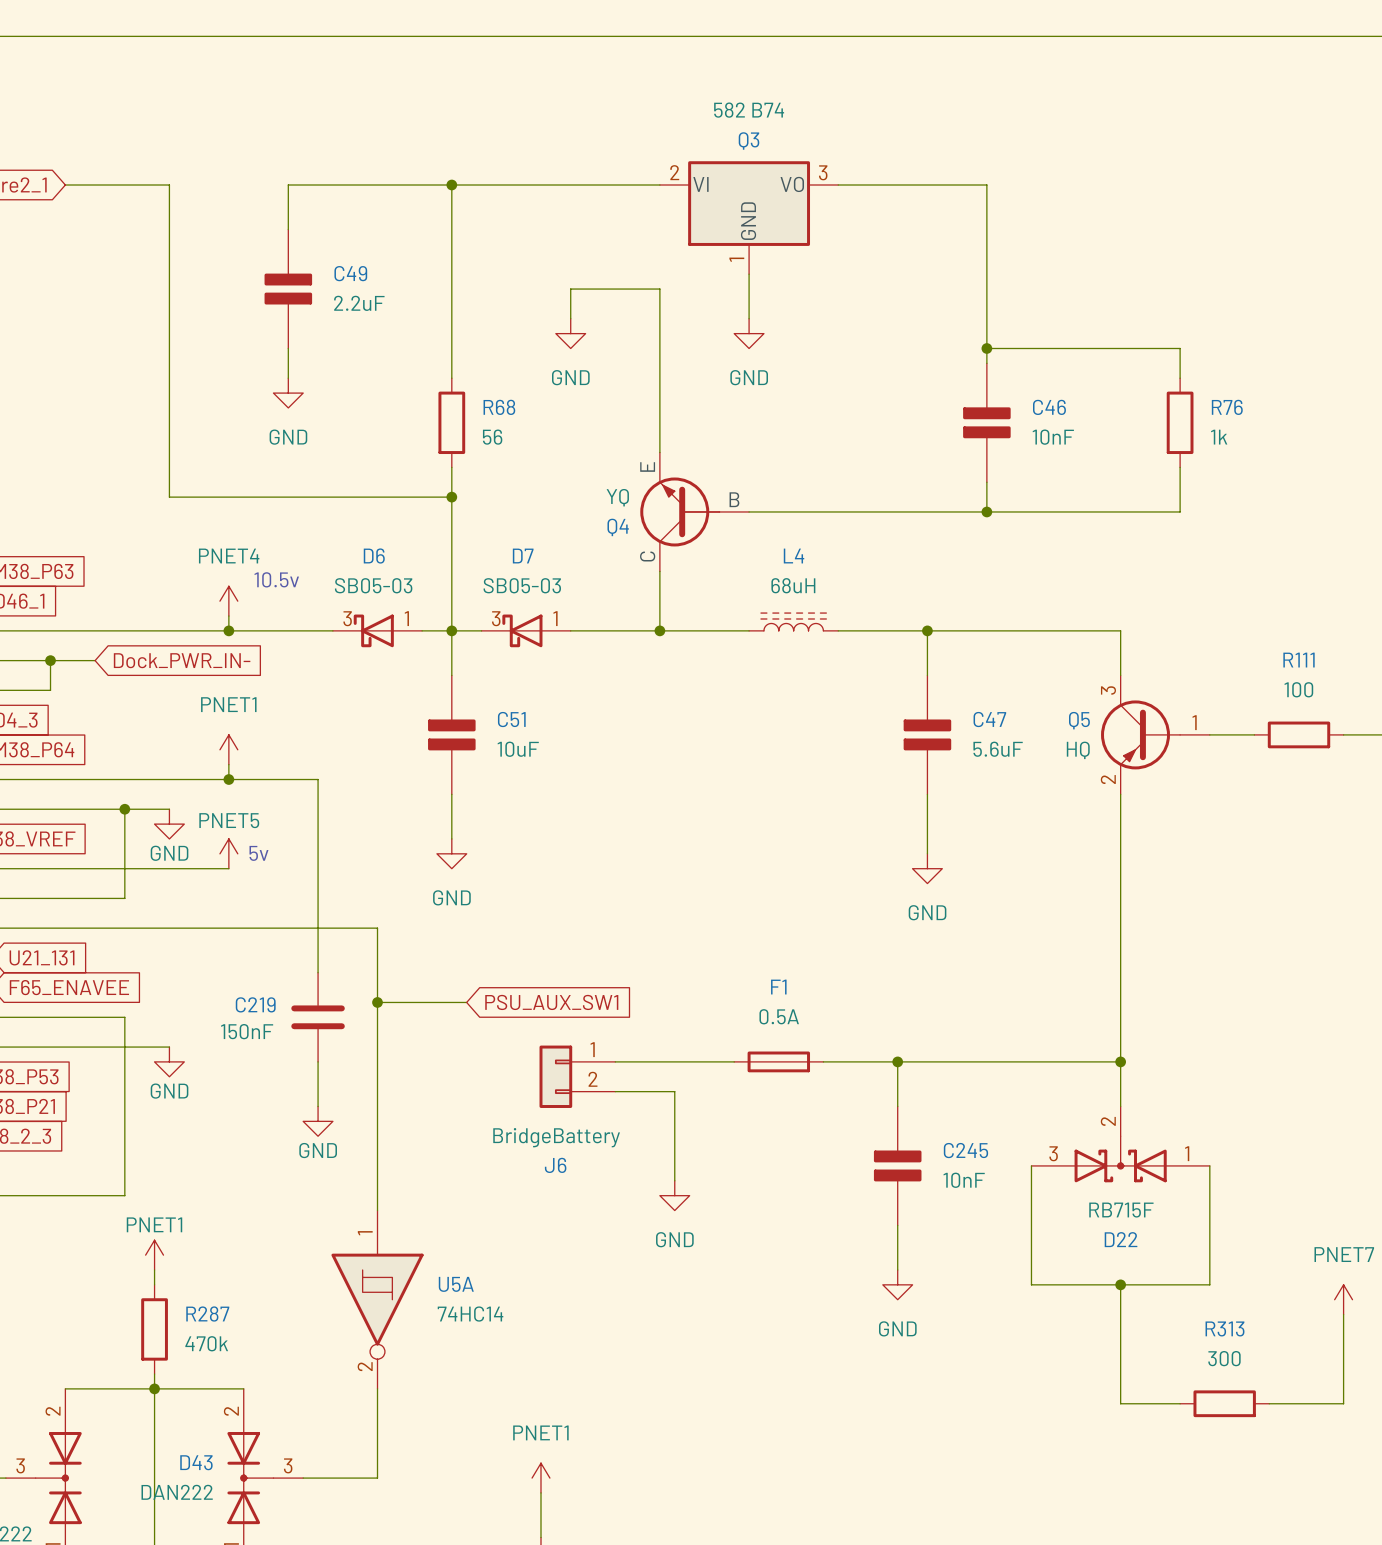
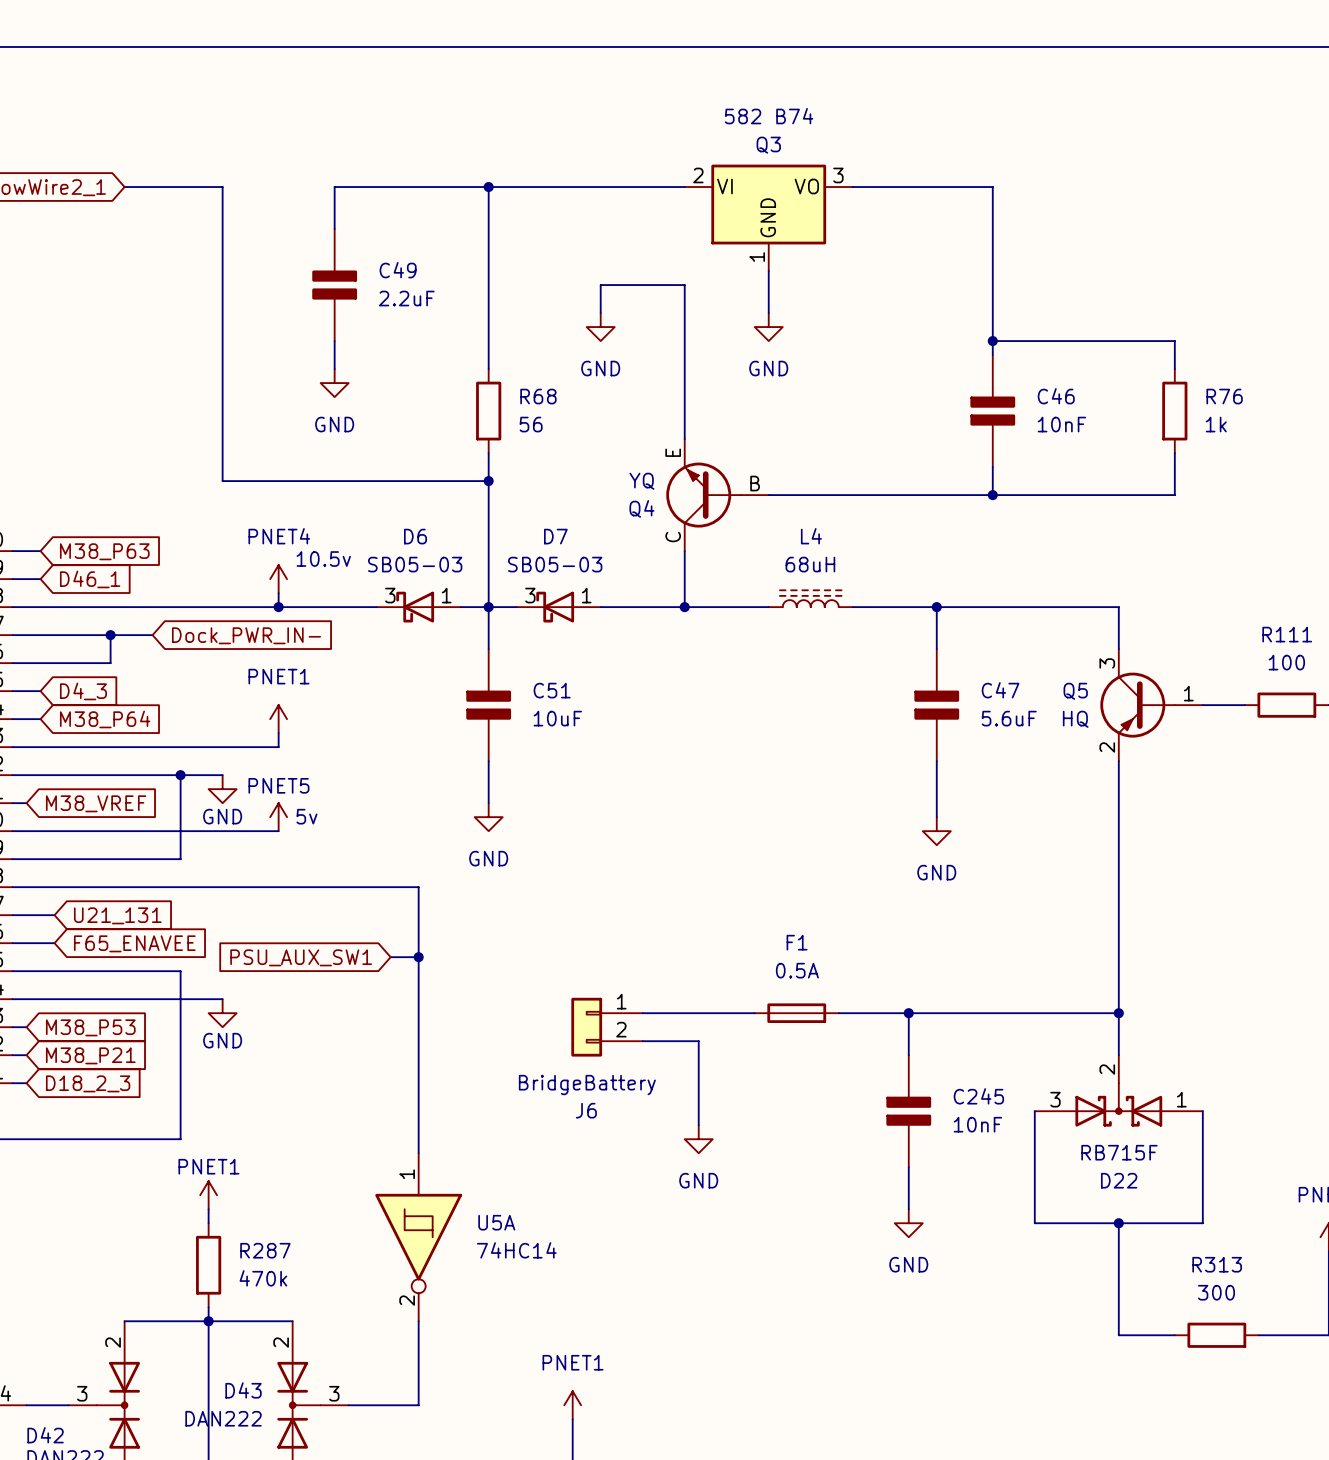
wire: (228, 779) (318, 779) (318, 972) -> none
junction: (228, 779) -> none
wire: (377, 1002) (466, 1002) -> (418, 957) (390, 957)
global label rotation: 0° (551, 1002) -> 180° (301, 957)
global label position: PSU_AUX_SW1 (551, 1002) -> PSU_AUX_SW1 (301, 957)
C219: 150nF (318, 1017) -> none
wire: (318, 1061) (318, 1106) -> none
power symbol: GND (318, 1121) -> none

